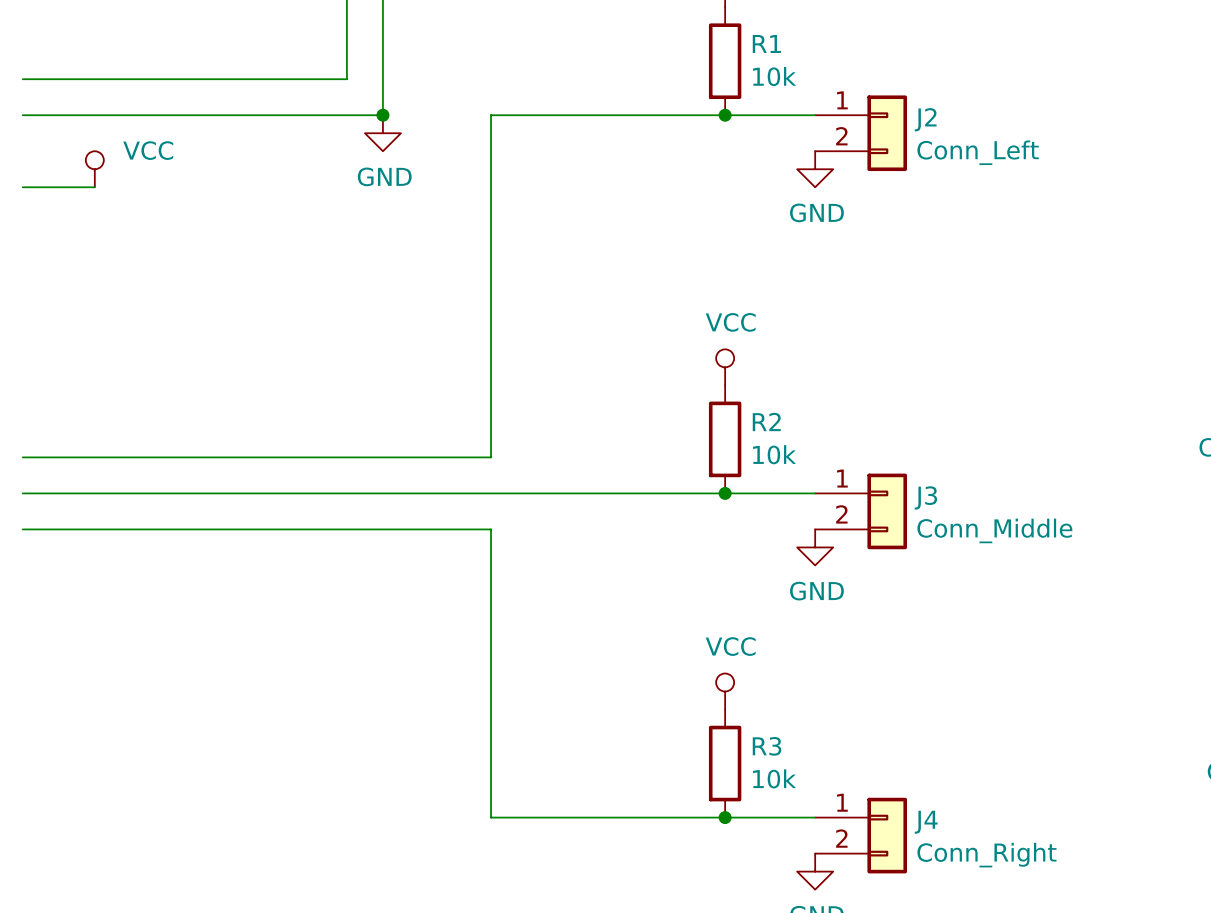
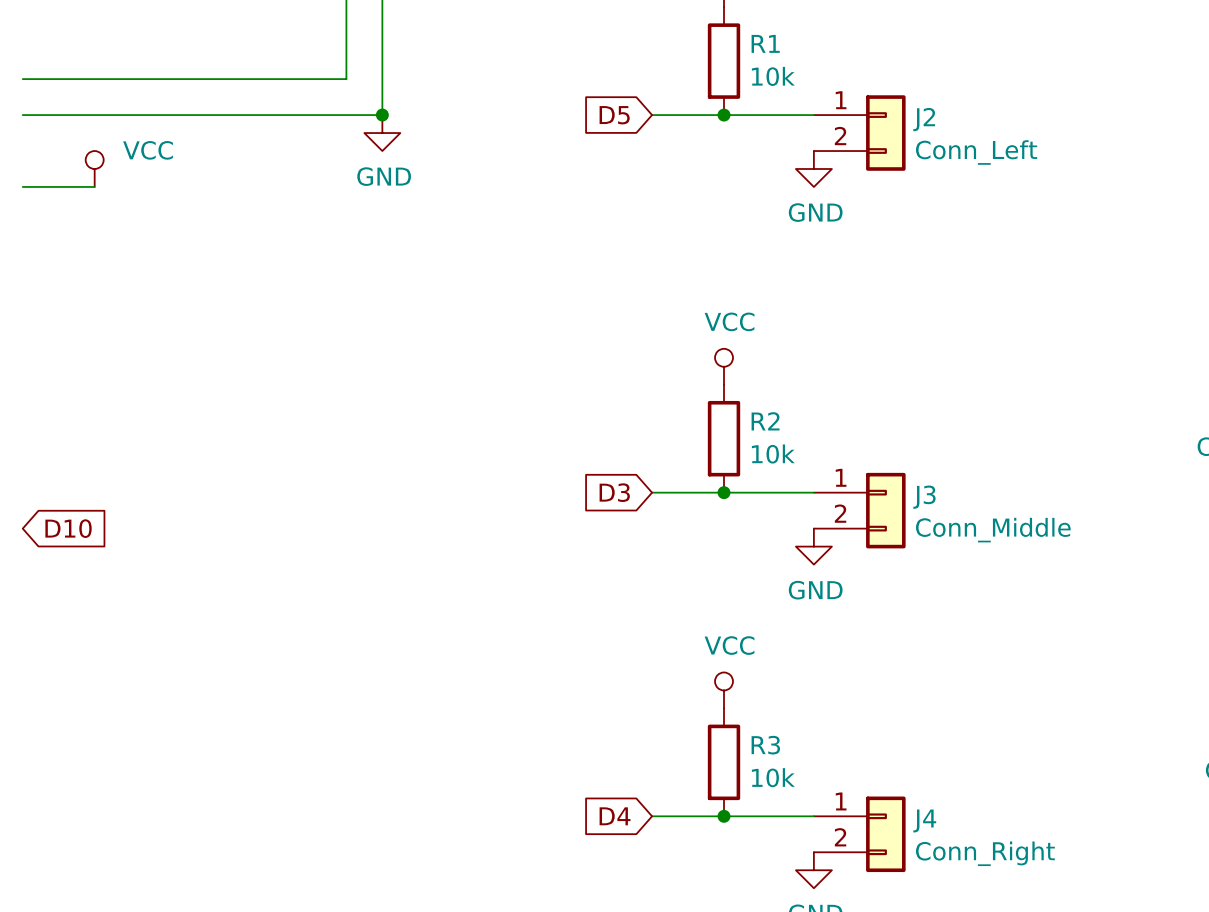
global label: none -> D5 (614, 115)
wire: (653, 115) (491, 115) (491, 457) (22, 457) -> none
wire: (22, 493) (653, 493) -> none
global label: none -> D3 (614, 492)
wire: (22, 529) (491, 529) (491, 817) (653, 817) -> none
global label: none -> D10 (68, 528)
global label: none -> D4 (615, 816)

